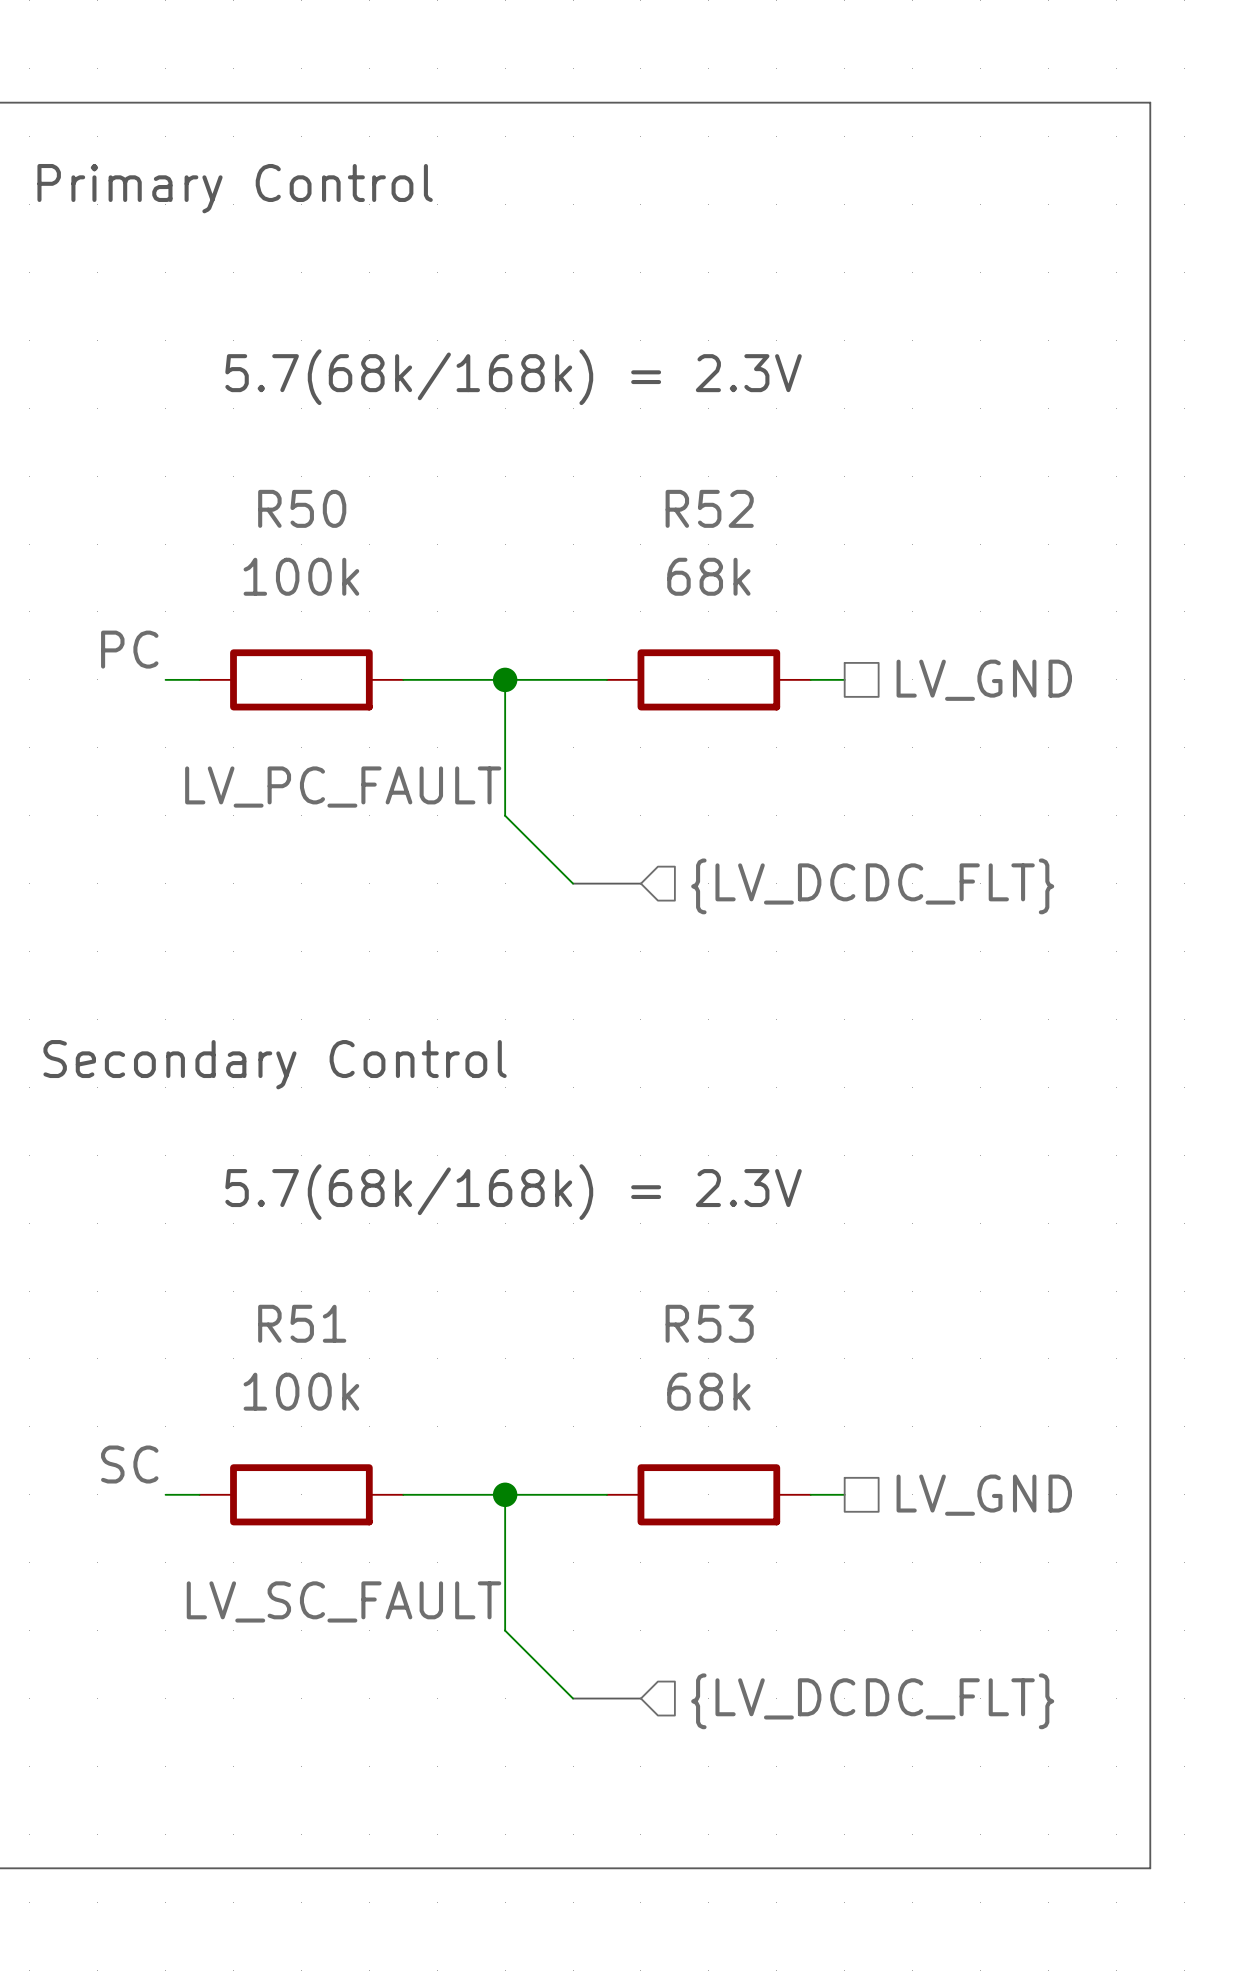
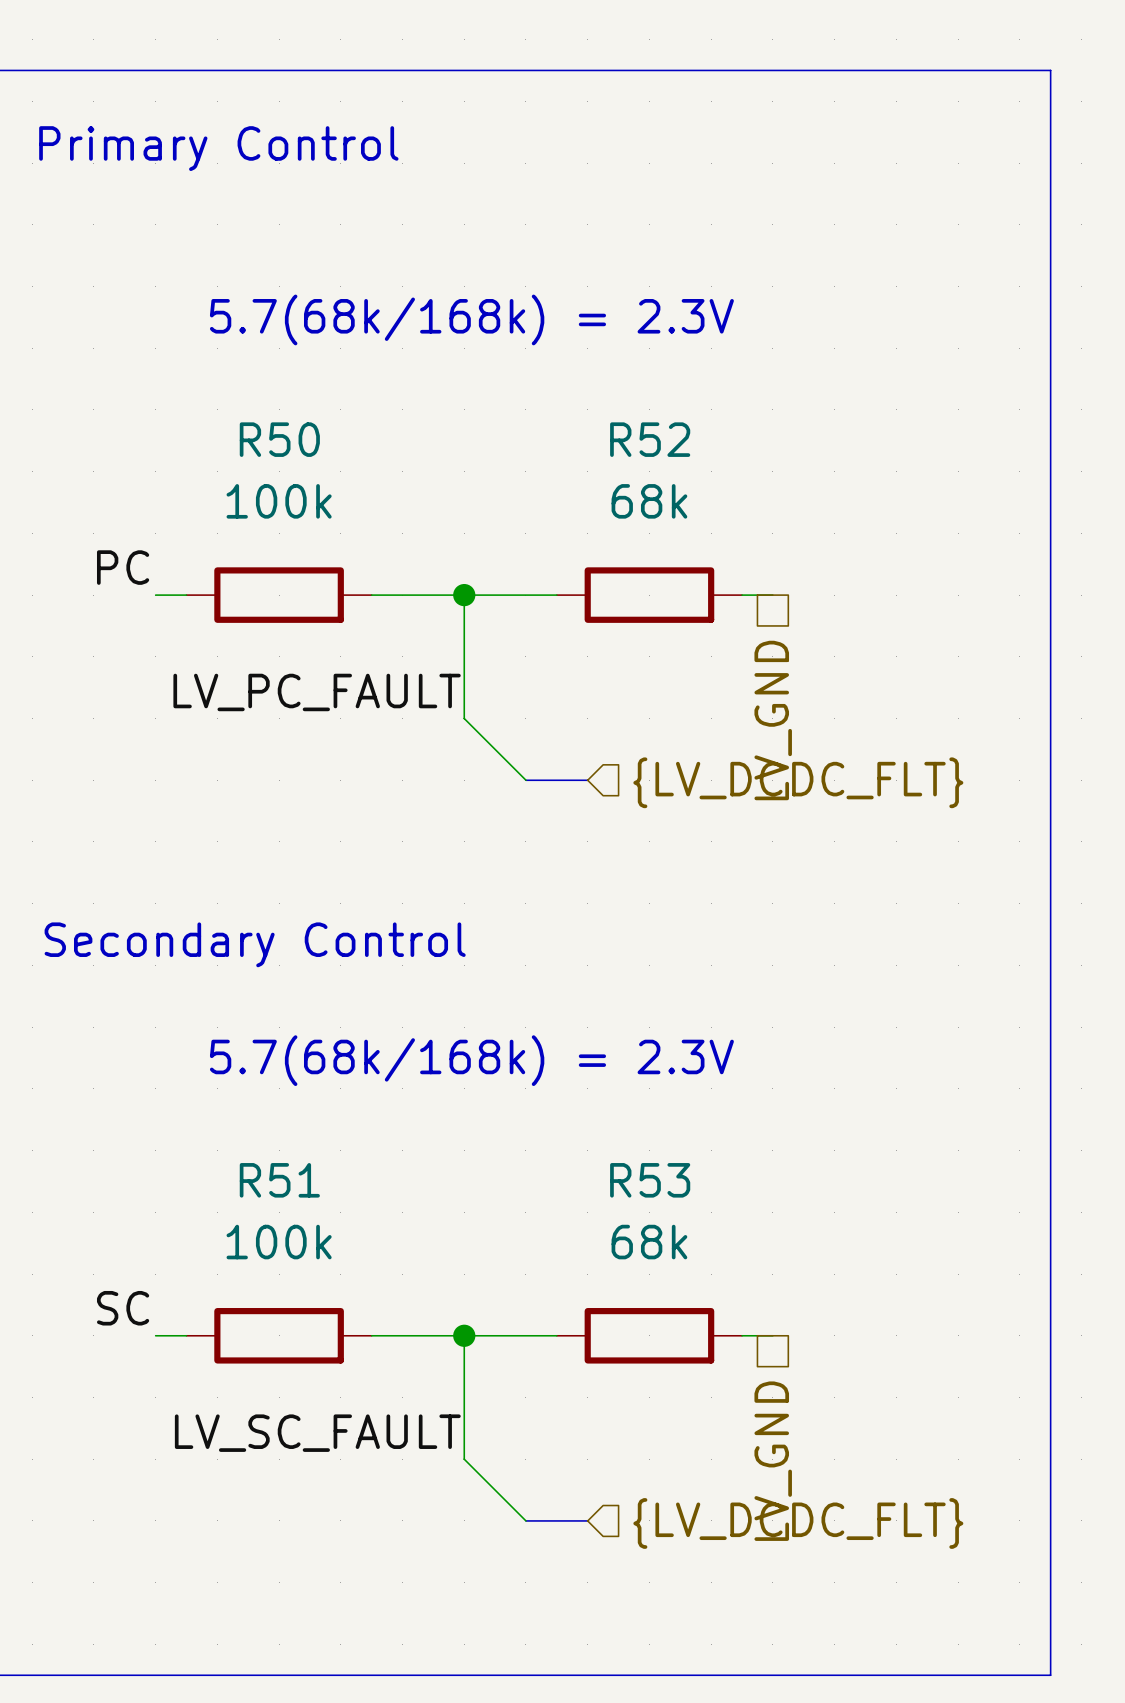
hierarchical label rotation: 0° (984, 680) -> 90° clockwise (773, 720)
hierarchical label rotation: 0° (984, 1495) -> 90° clockwise (773, 1461)

